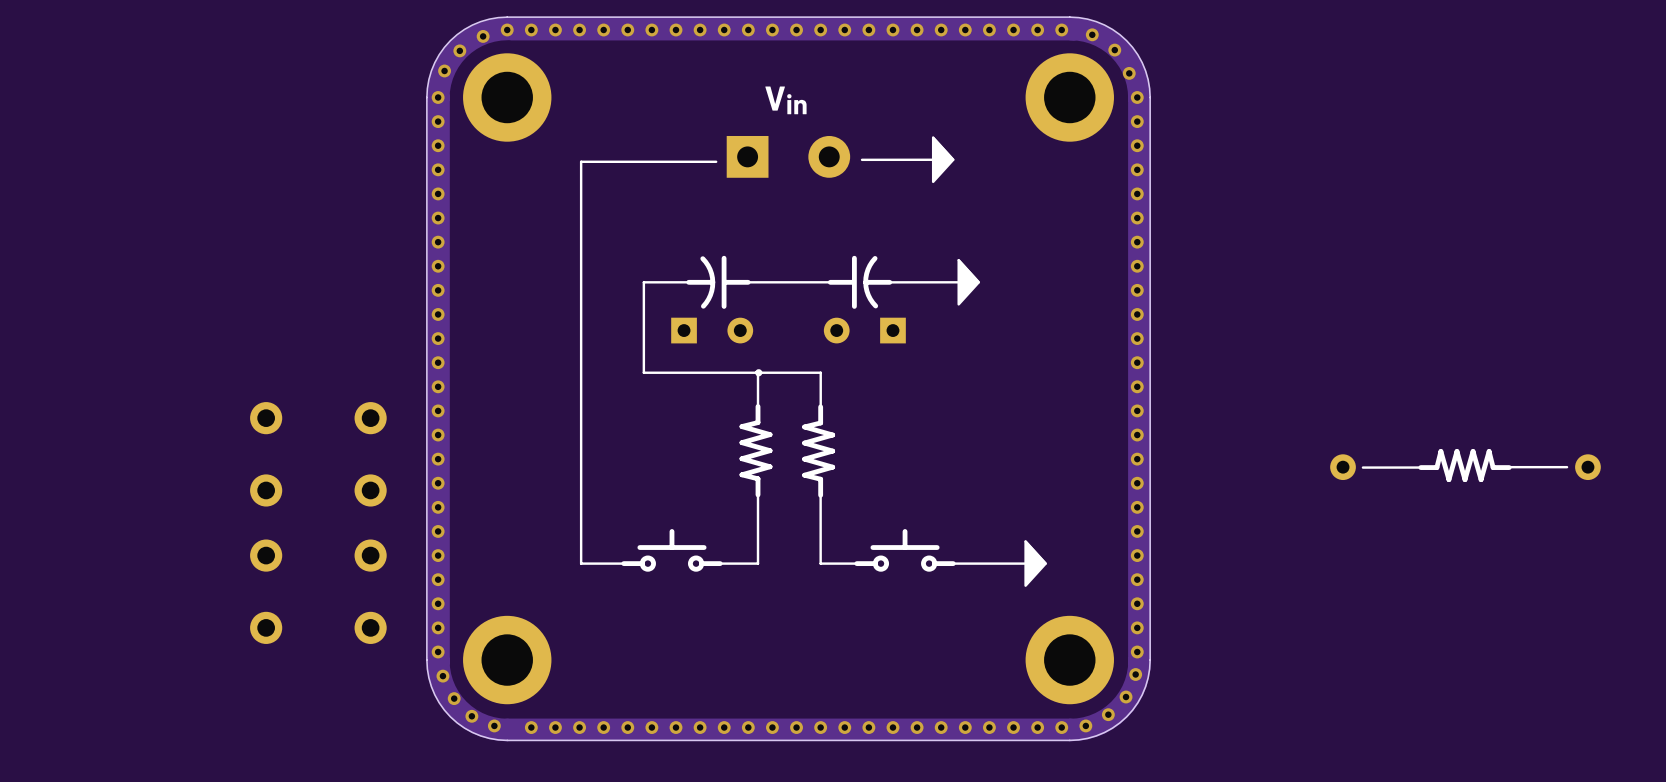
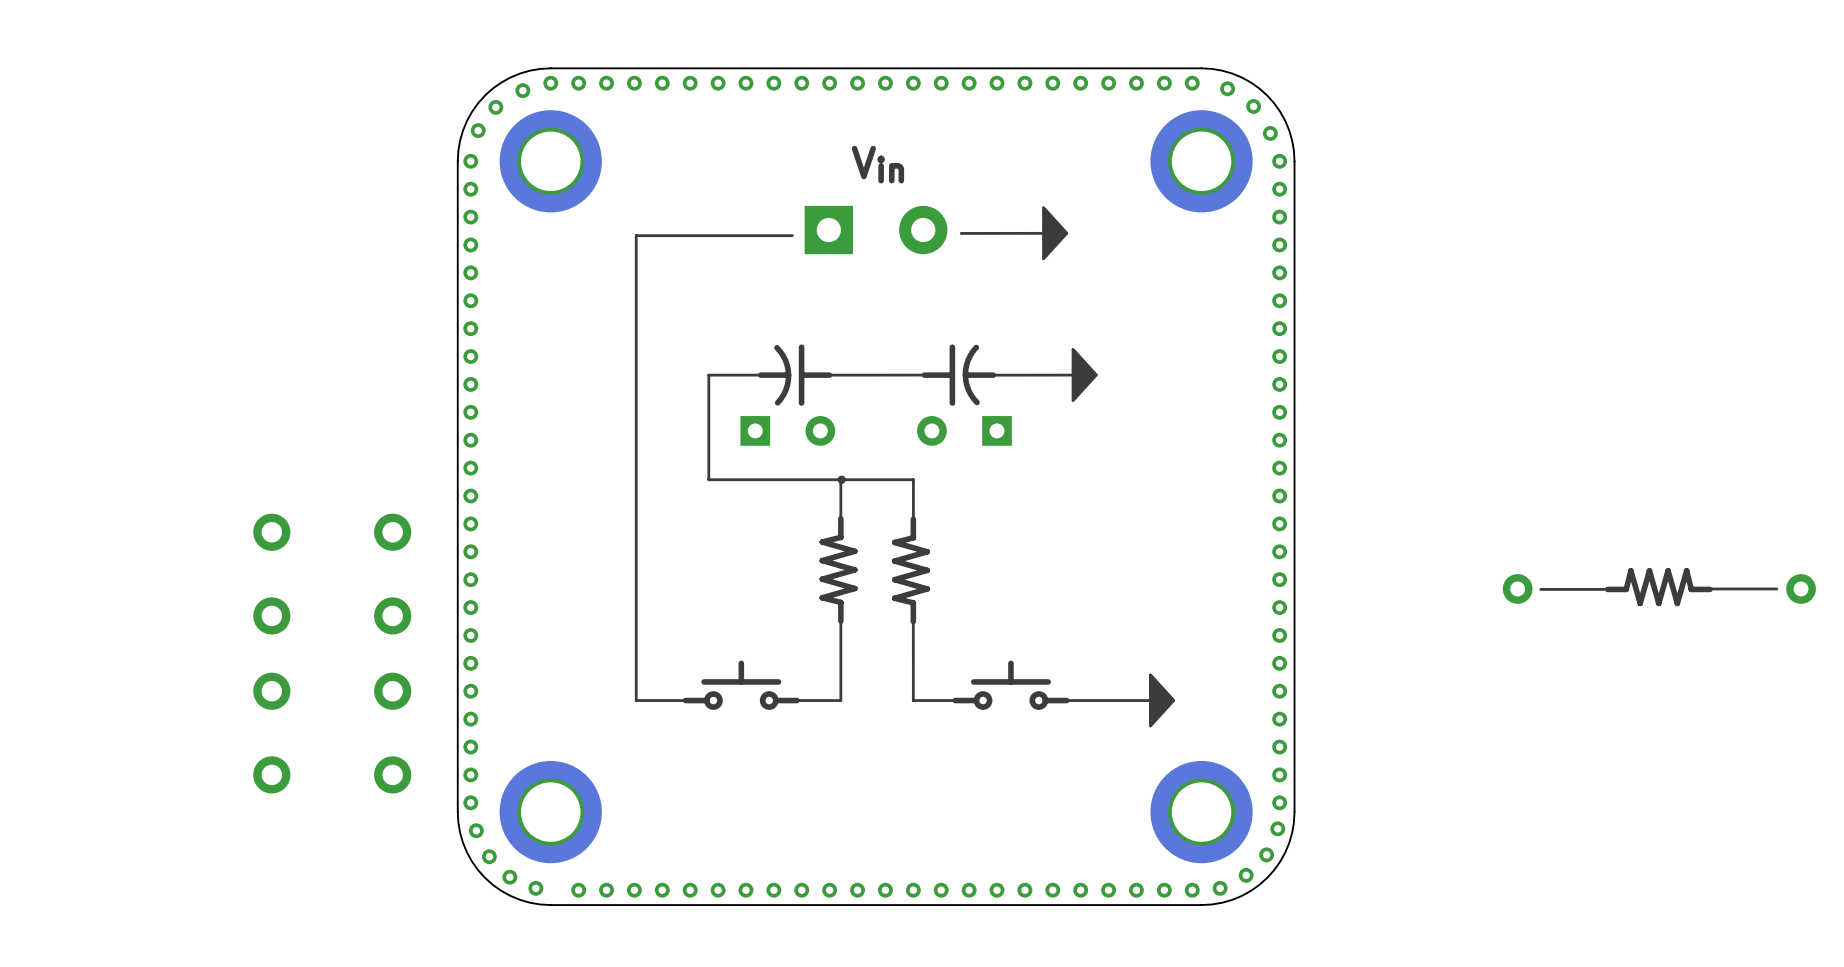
track: (507, 28) (484, 32) (470, 39) (458, 49) (448, 61) (442, 75) (438, 98) -> none
track: (1070, 28) (1093, 32) (1107, 39) (1119, 49) (1132, 67) (1137, 82) (1139, 97) -> none
track: (1073, 29) (511, 29) -> none
track: (438, 98) (438, 660) -> none
track: (1139, 98) (1139, 660) -> none
track: (438, 660) (442, 683) (448, 697) (458, 709) (470, 719) (484, 726) (507, 730) -> none
track: (1139, 660) (1137, 676) (1132, 690) (1119, 709) (1107, 719) (1093, 726) (1070, 730) -> none
track: (1070, 729) (507, 729) -> none

